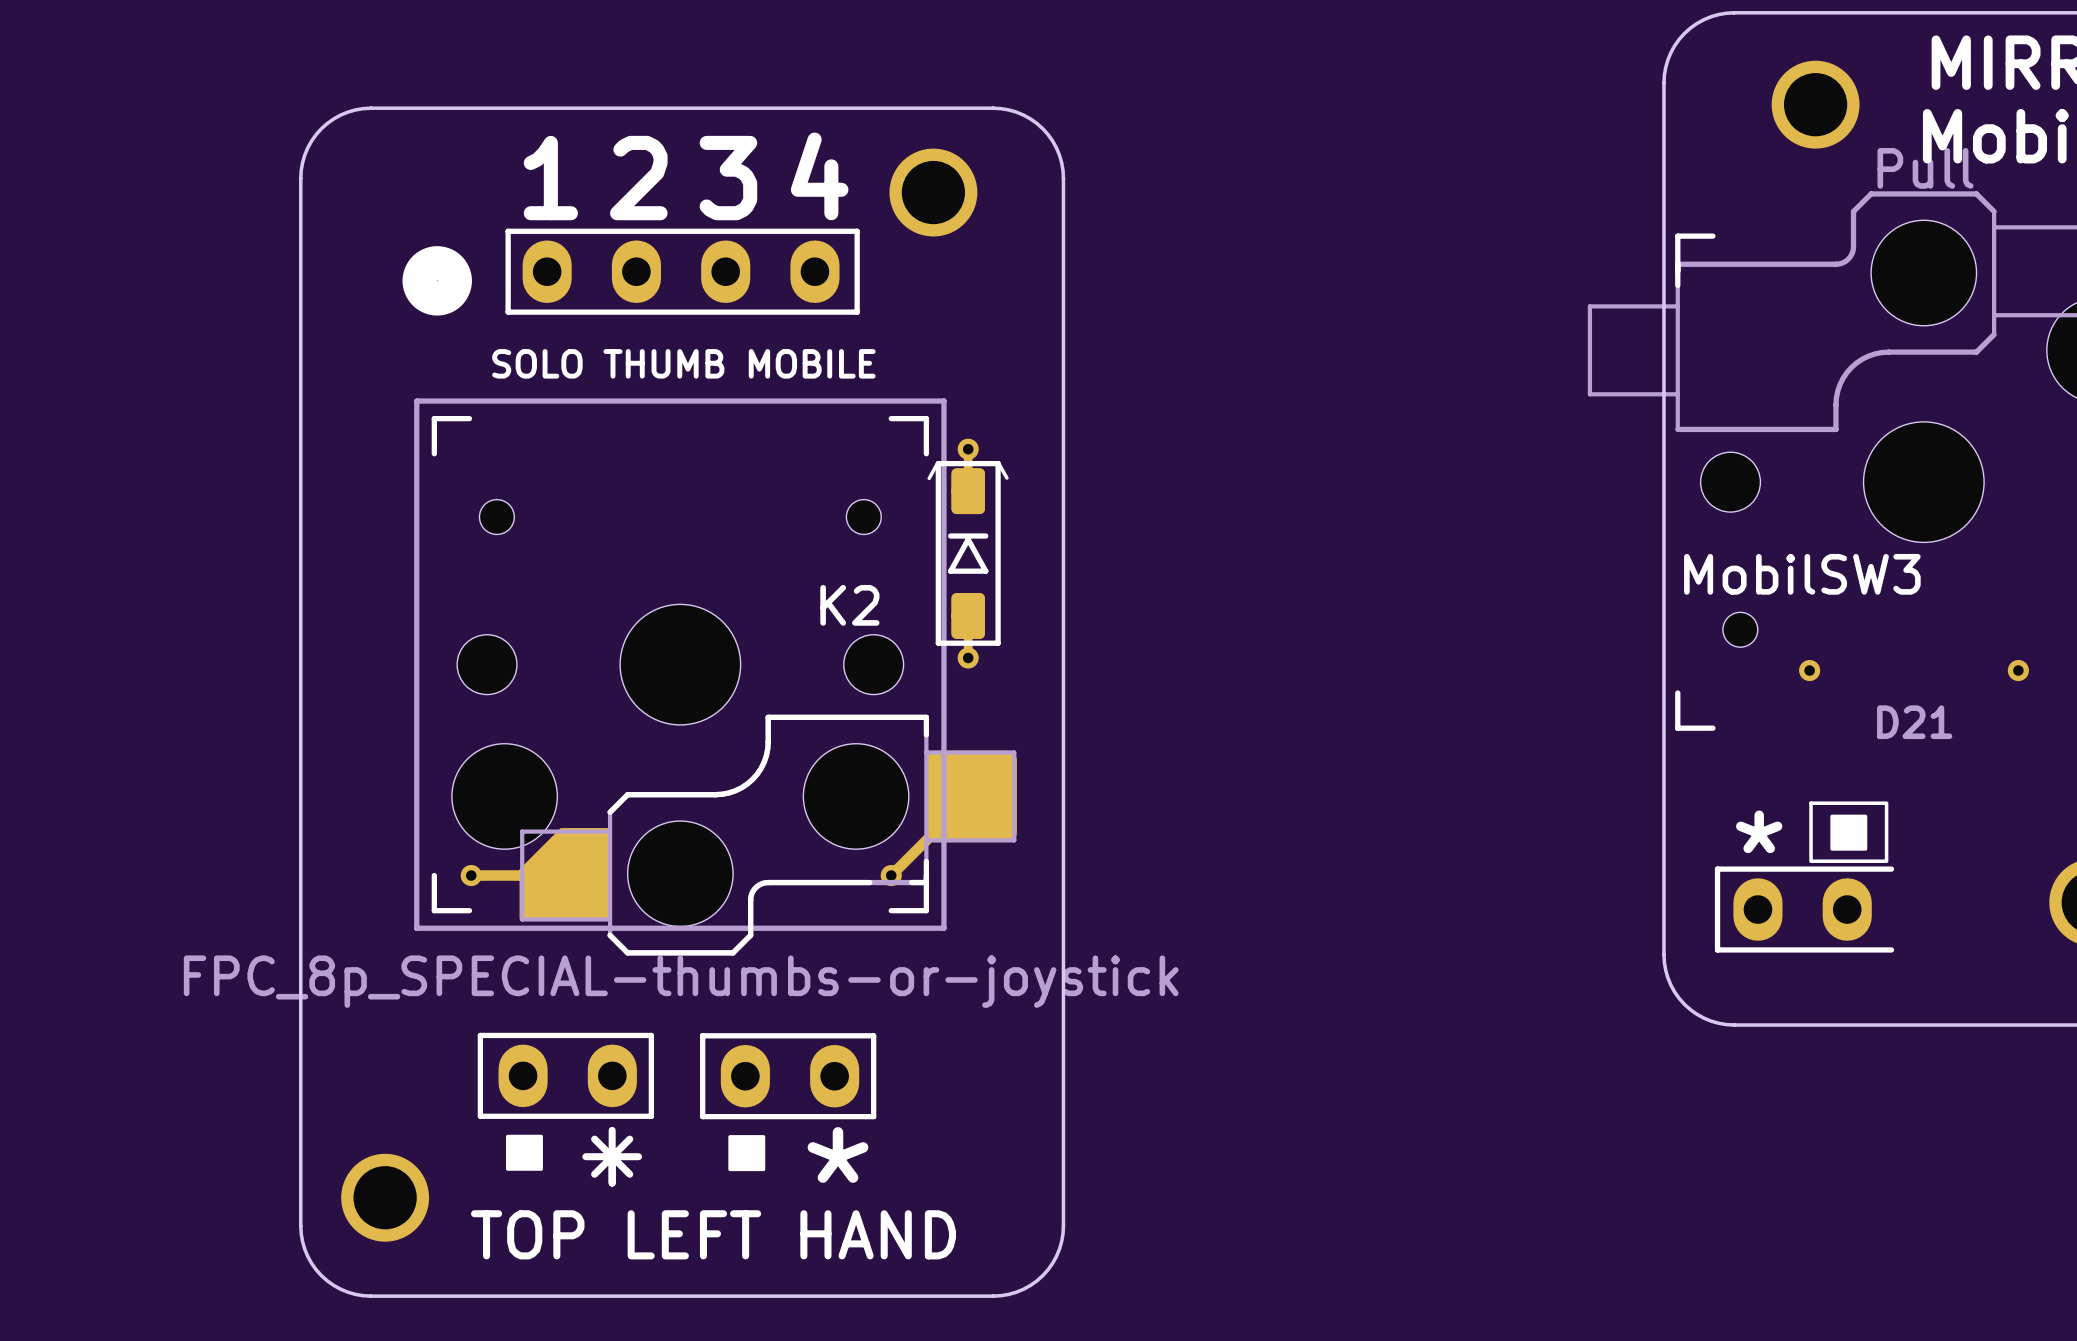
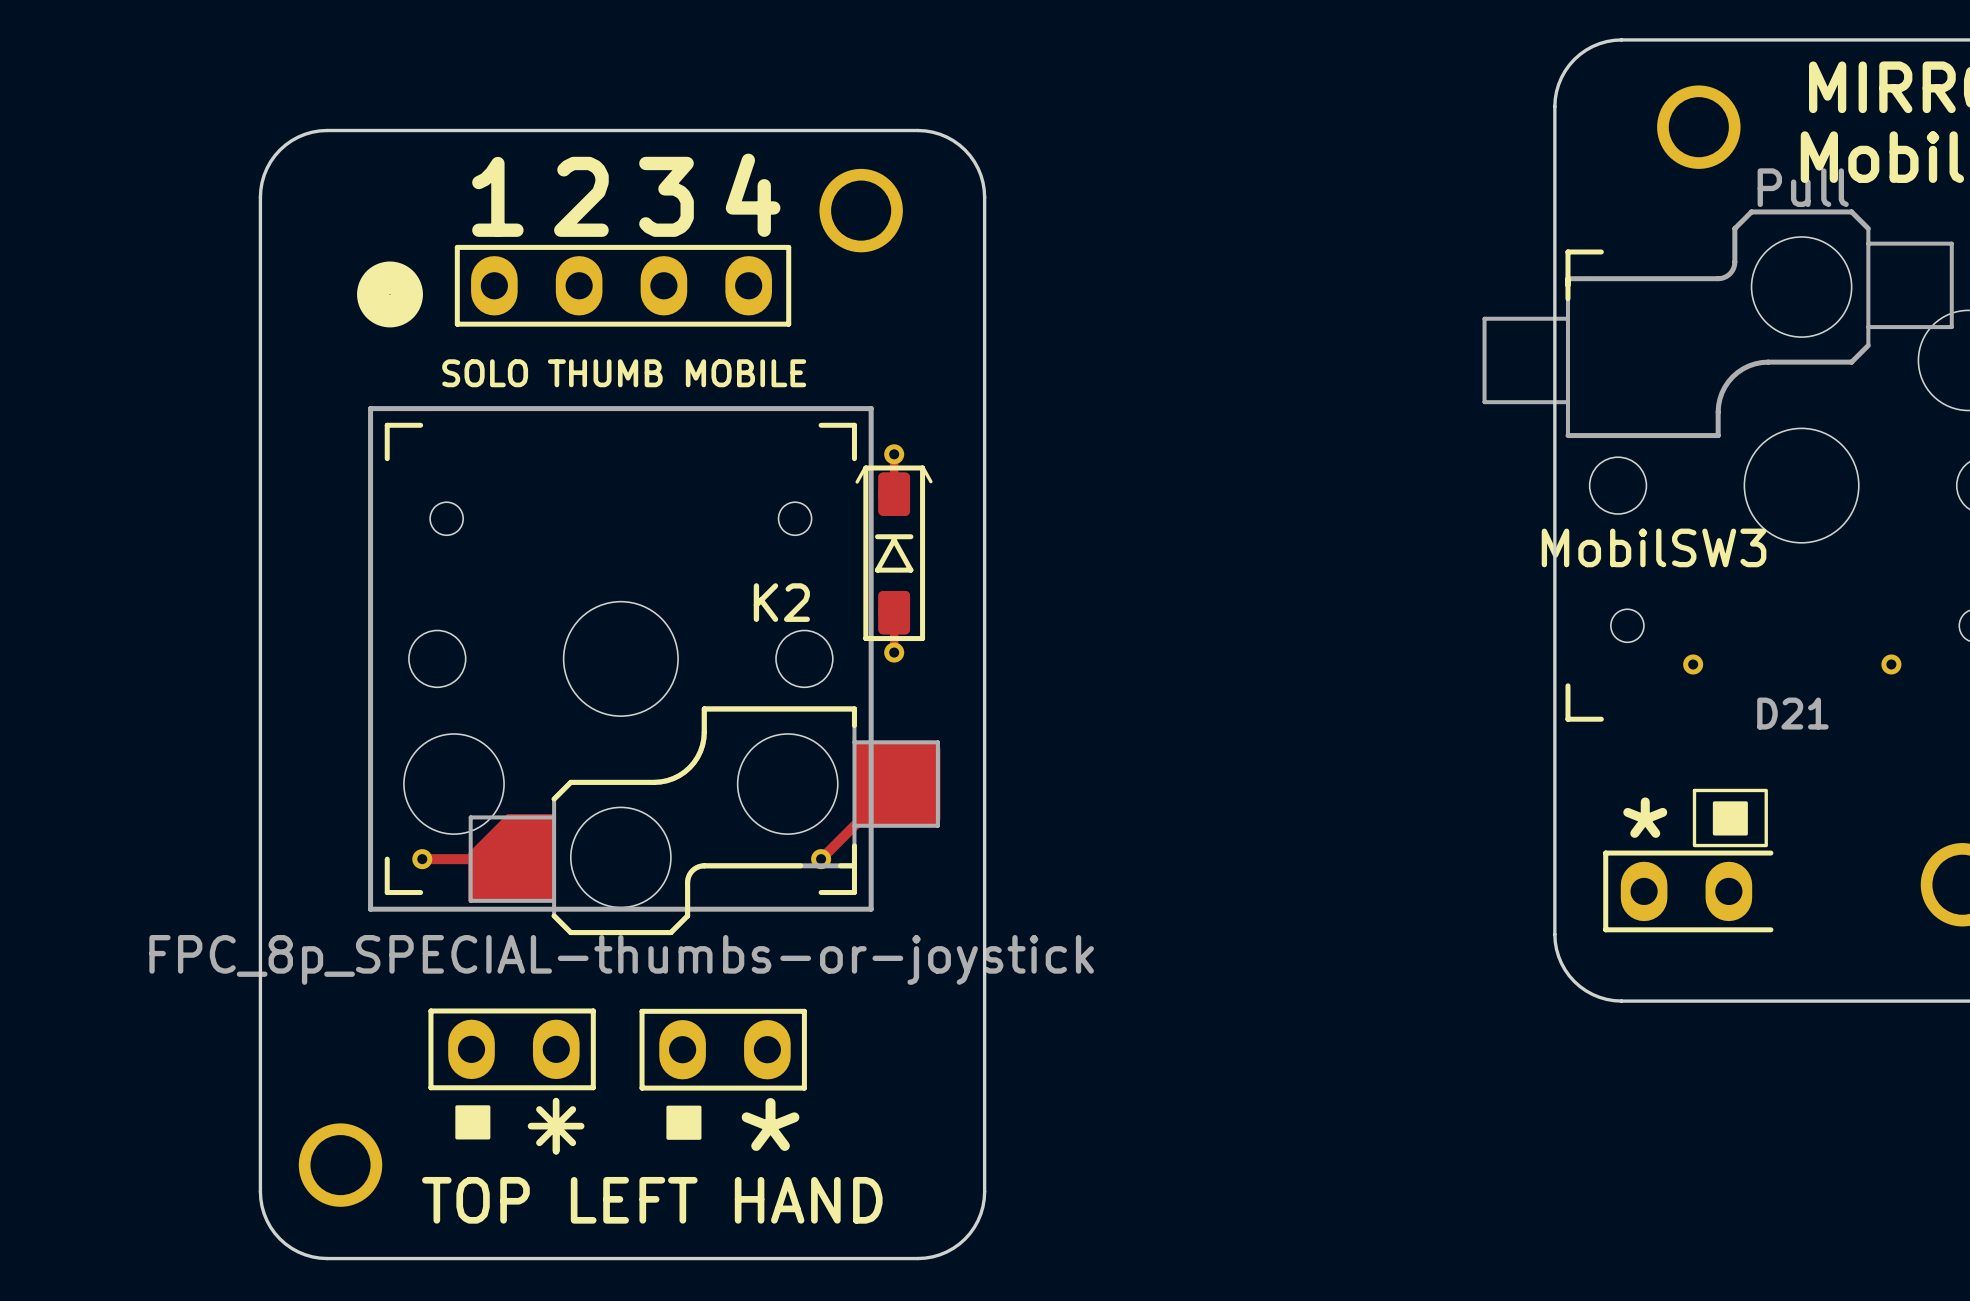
MobilSW3 name position: MobilSW3 (1802, 574) -> MobilSW3 (1654, 547)

